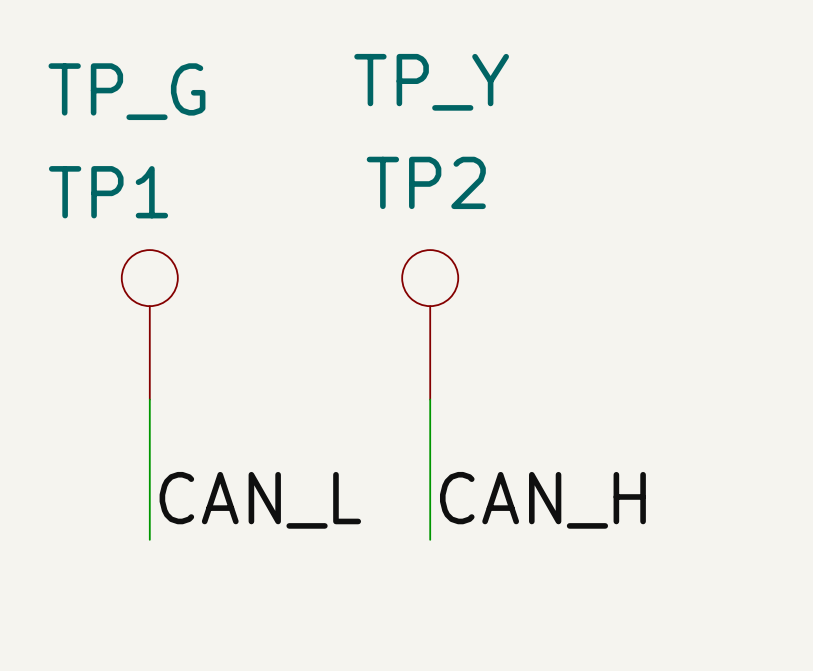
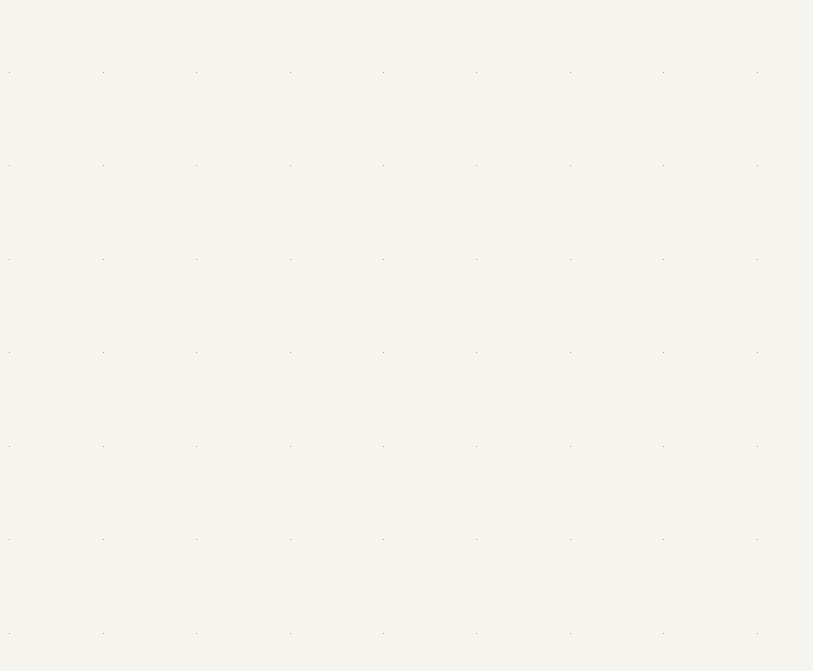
TP1: TP_G (149, 324) -> none
TP2: TP_Y (430, 324) -> none
wire: (149, 399) (149, 539) -> none
wire: (430, 399) (430, 539) -> none
label: CAN_L (260, 500) -> none
label: CAN_H (542, 500) -> none

